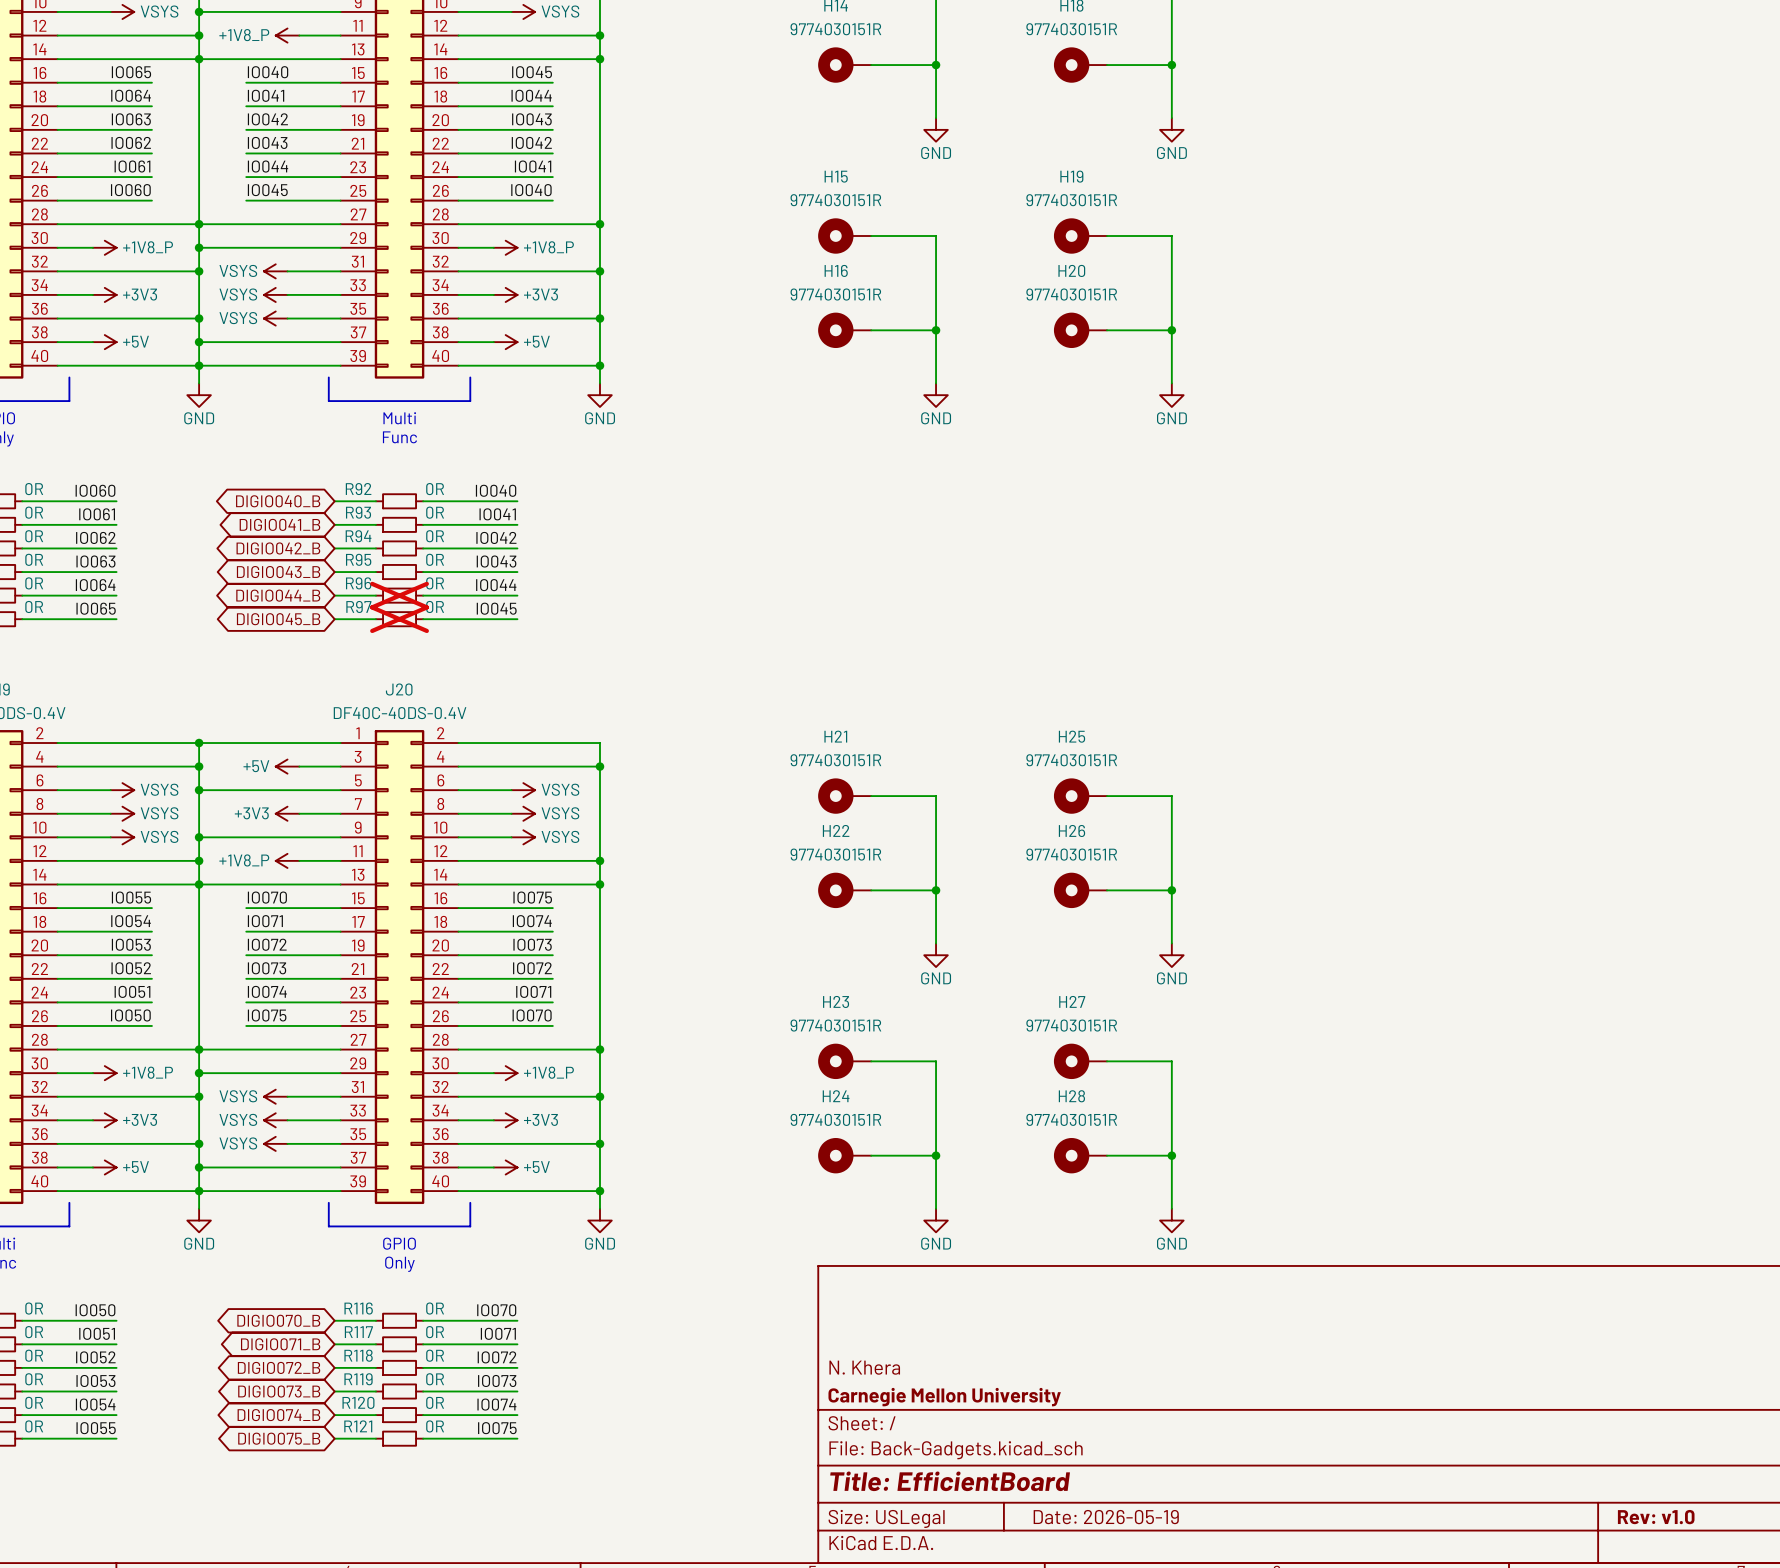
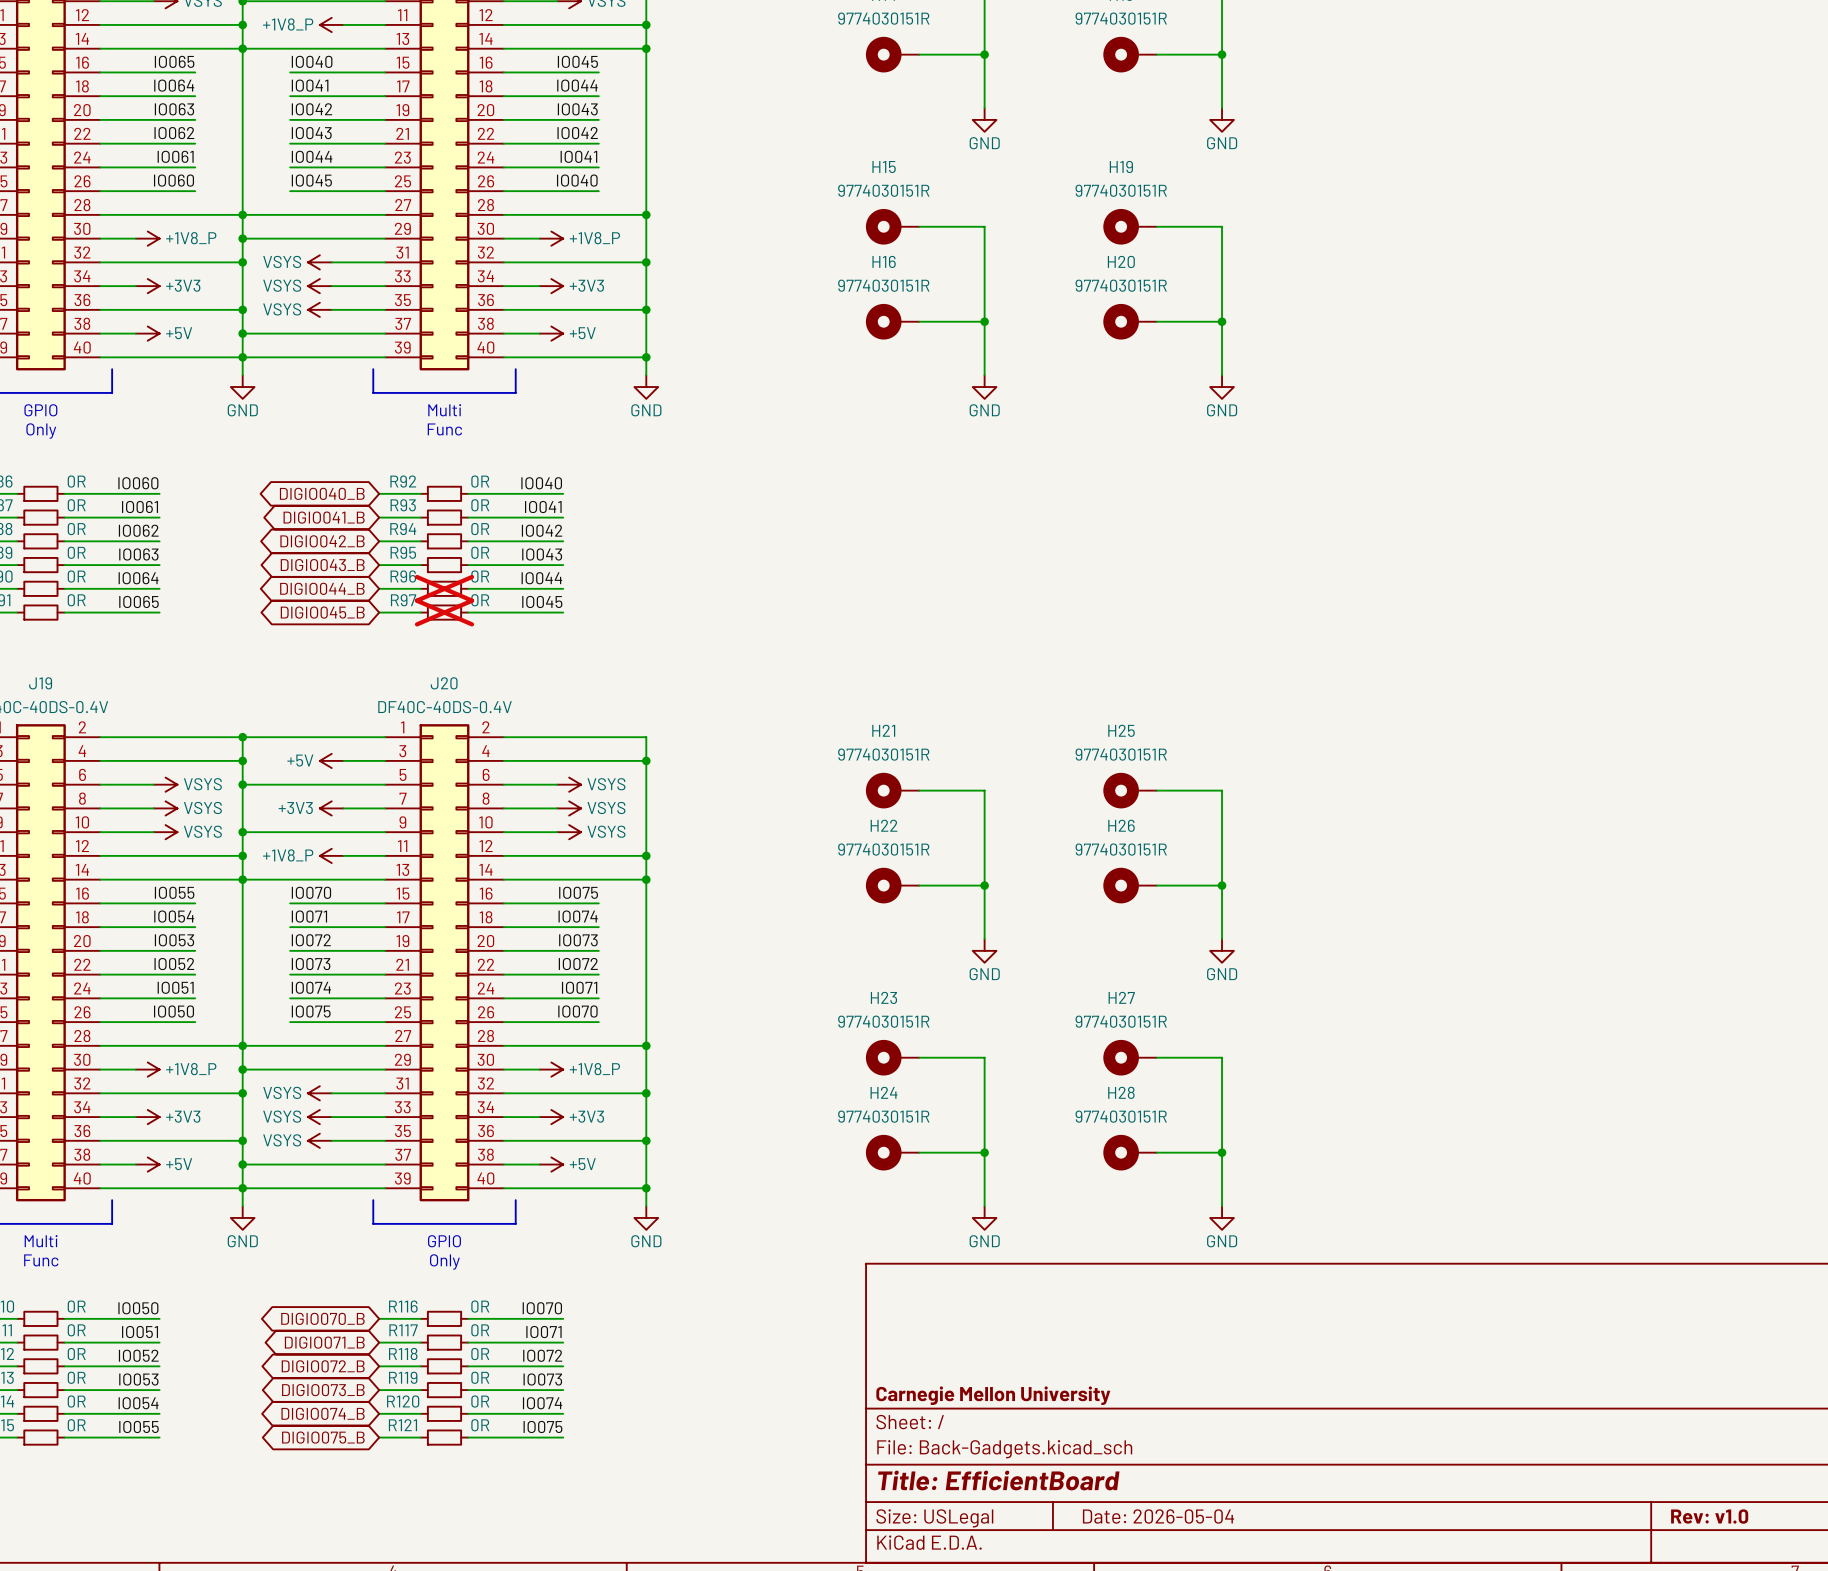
title block: N. Khera (864, 1367) -> none
title block: Date: 2026-05-19 (1106, 1517) -> Date: 2026-05-04 (1158, 1516)

